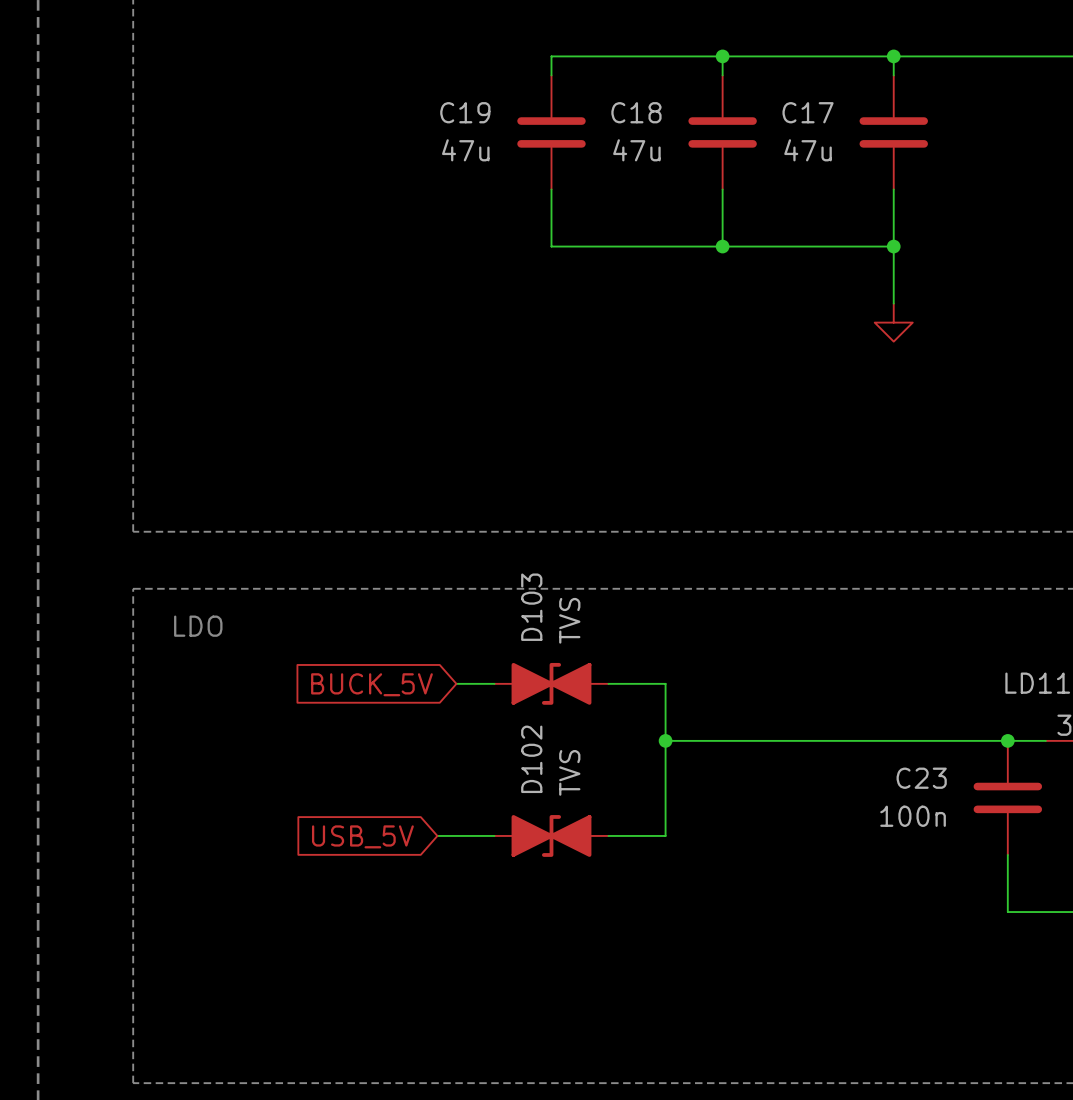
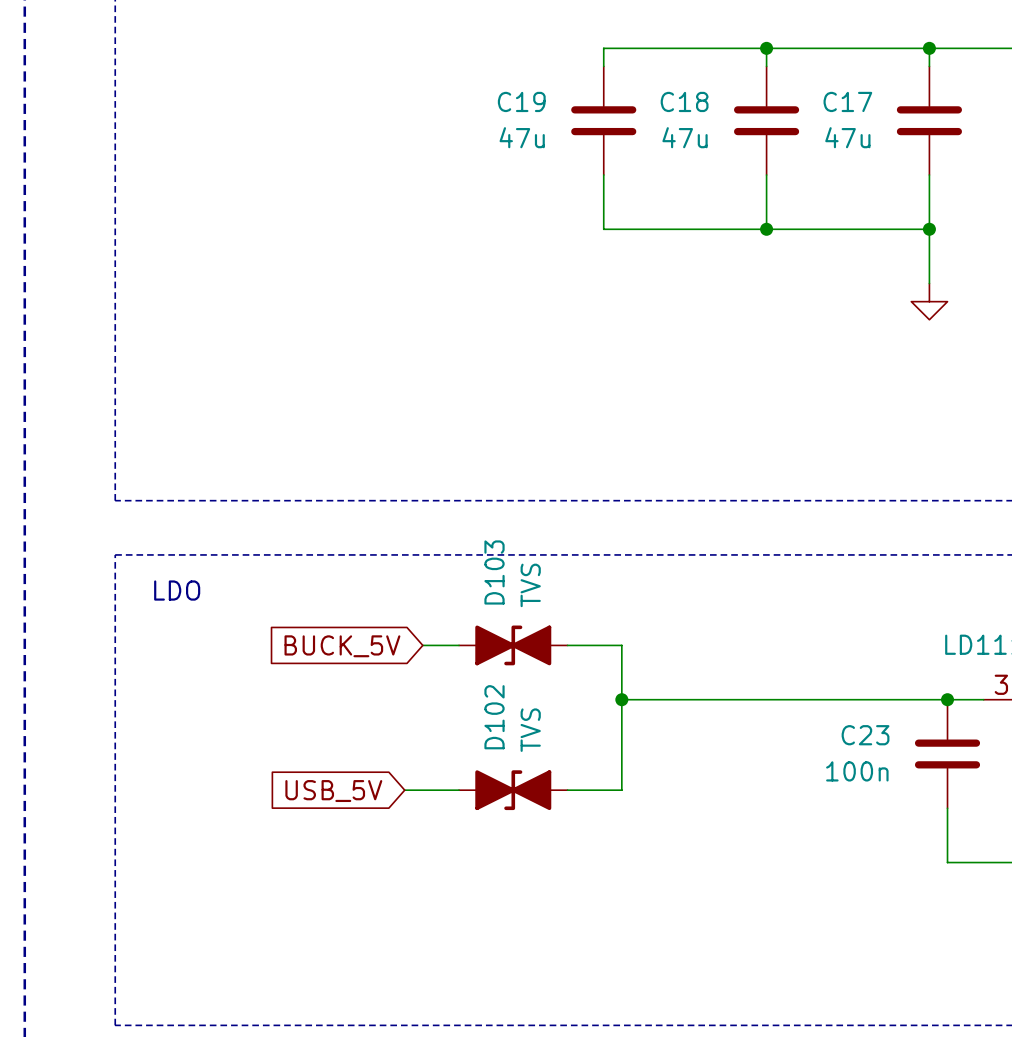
wire: (646, 56) (551, 56) (551, 75) -> (603, 48) (603, 66)
wire: (722, 56) (722, 75) -> (766, 48) (766, 66)
junction: (722, 56) -> none
junction: none -> (766, 48)
wire: (893, 56) (893, 75) -> (929, 48) (929, 66)
junction: (893, 56) -> none
junction: none -> (929, 48)
C19 position: (551, 132) -> (603, 120)
C18 position: (722, 132) -> (766, 120)
C17 position: (893, 132) -> (929, 120)
wire: (551, 189) (551, 246) (646, 246) -> (603, 175) (603, 229)
wire: (722, 189) (722, 246) -> (766, 175) (766, 229)
wire: (893, 189) (893, 303) -> (929, 175) (929, 283)
junction: (722, 246) -> none
junction: none -> (766, 229)
wire: none -> (838, 229) (929, 229)
junction: (893, 246) -> none
junction: none -> (929, 229)
power symbol position: (893, 322) -> (929, 301)

